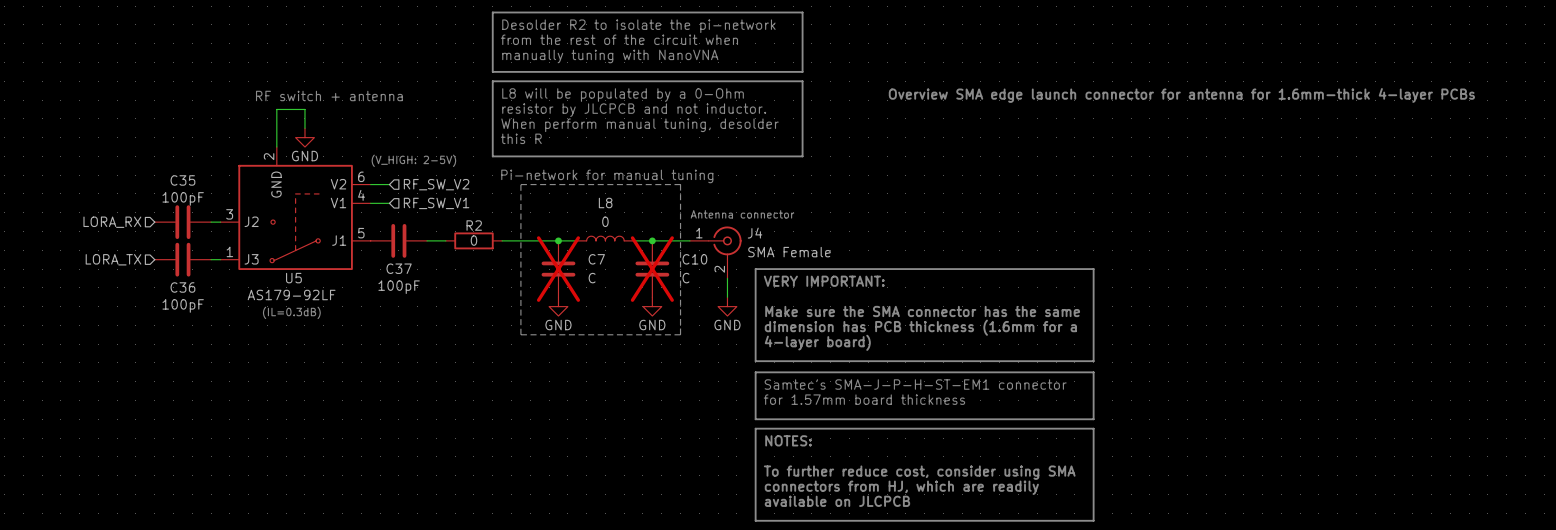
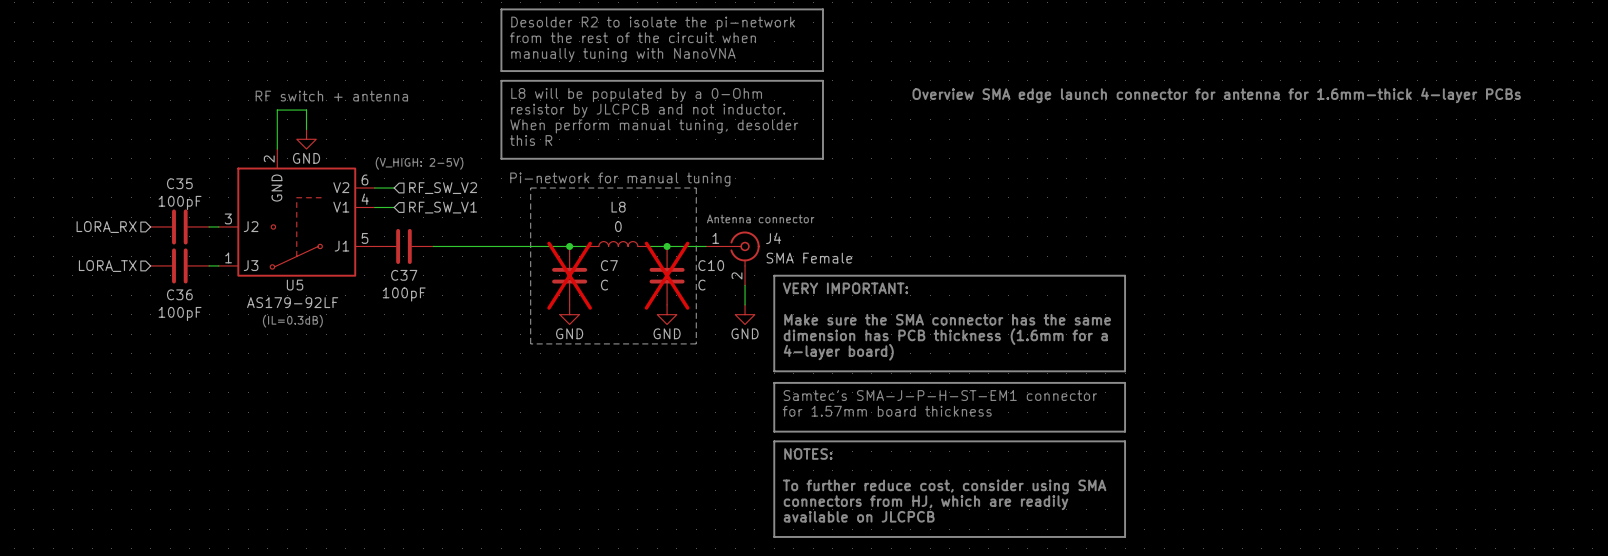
wire: none -> (452, 246) (511, 246)
R2: 0 (473, 240) -> none

